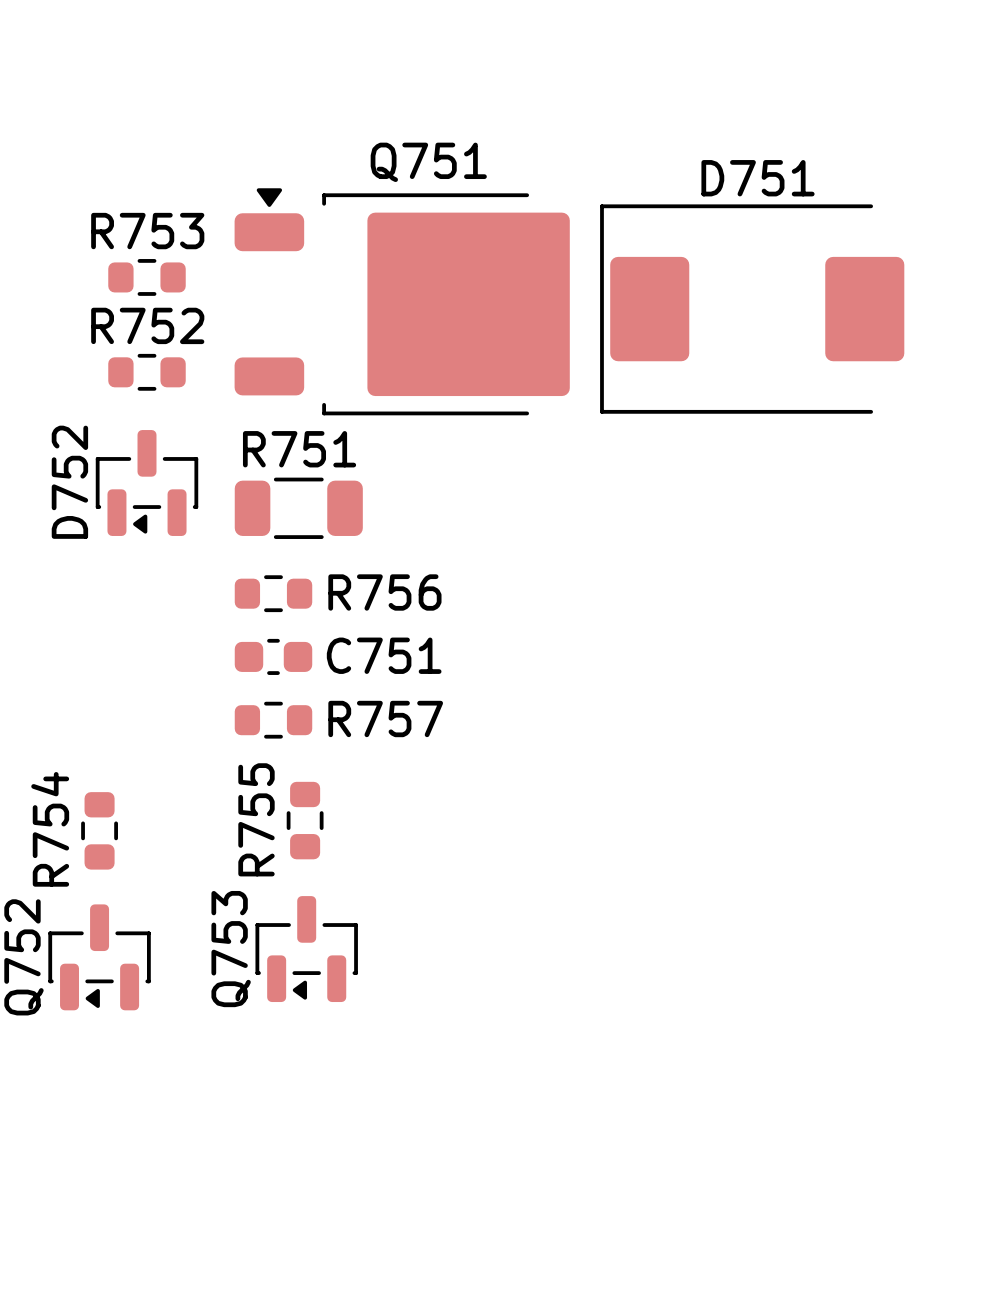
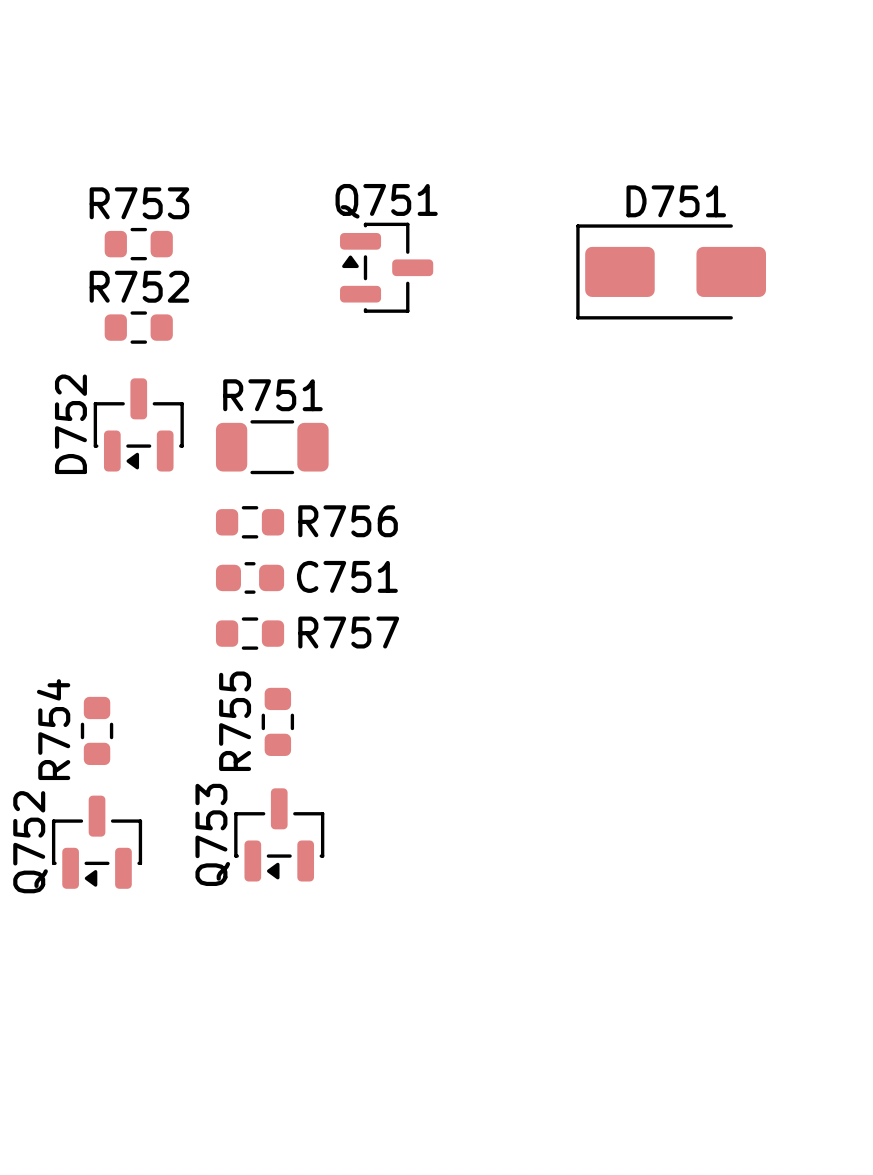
Q751 name position: Q751 (428, 162) -> Q751 (386, 201)
Q751 footprint: [234, 188, 570, 416] -> [340, 222, 434, 313]
D751 footprint: [600, 204, 905, 414] -> [576, 224, 767, 320]

